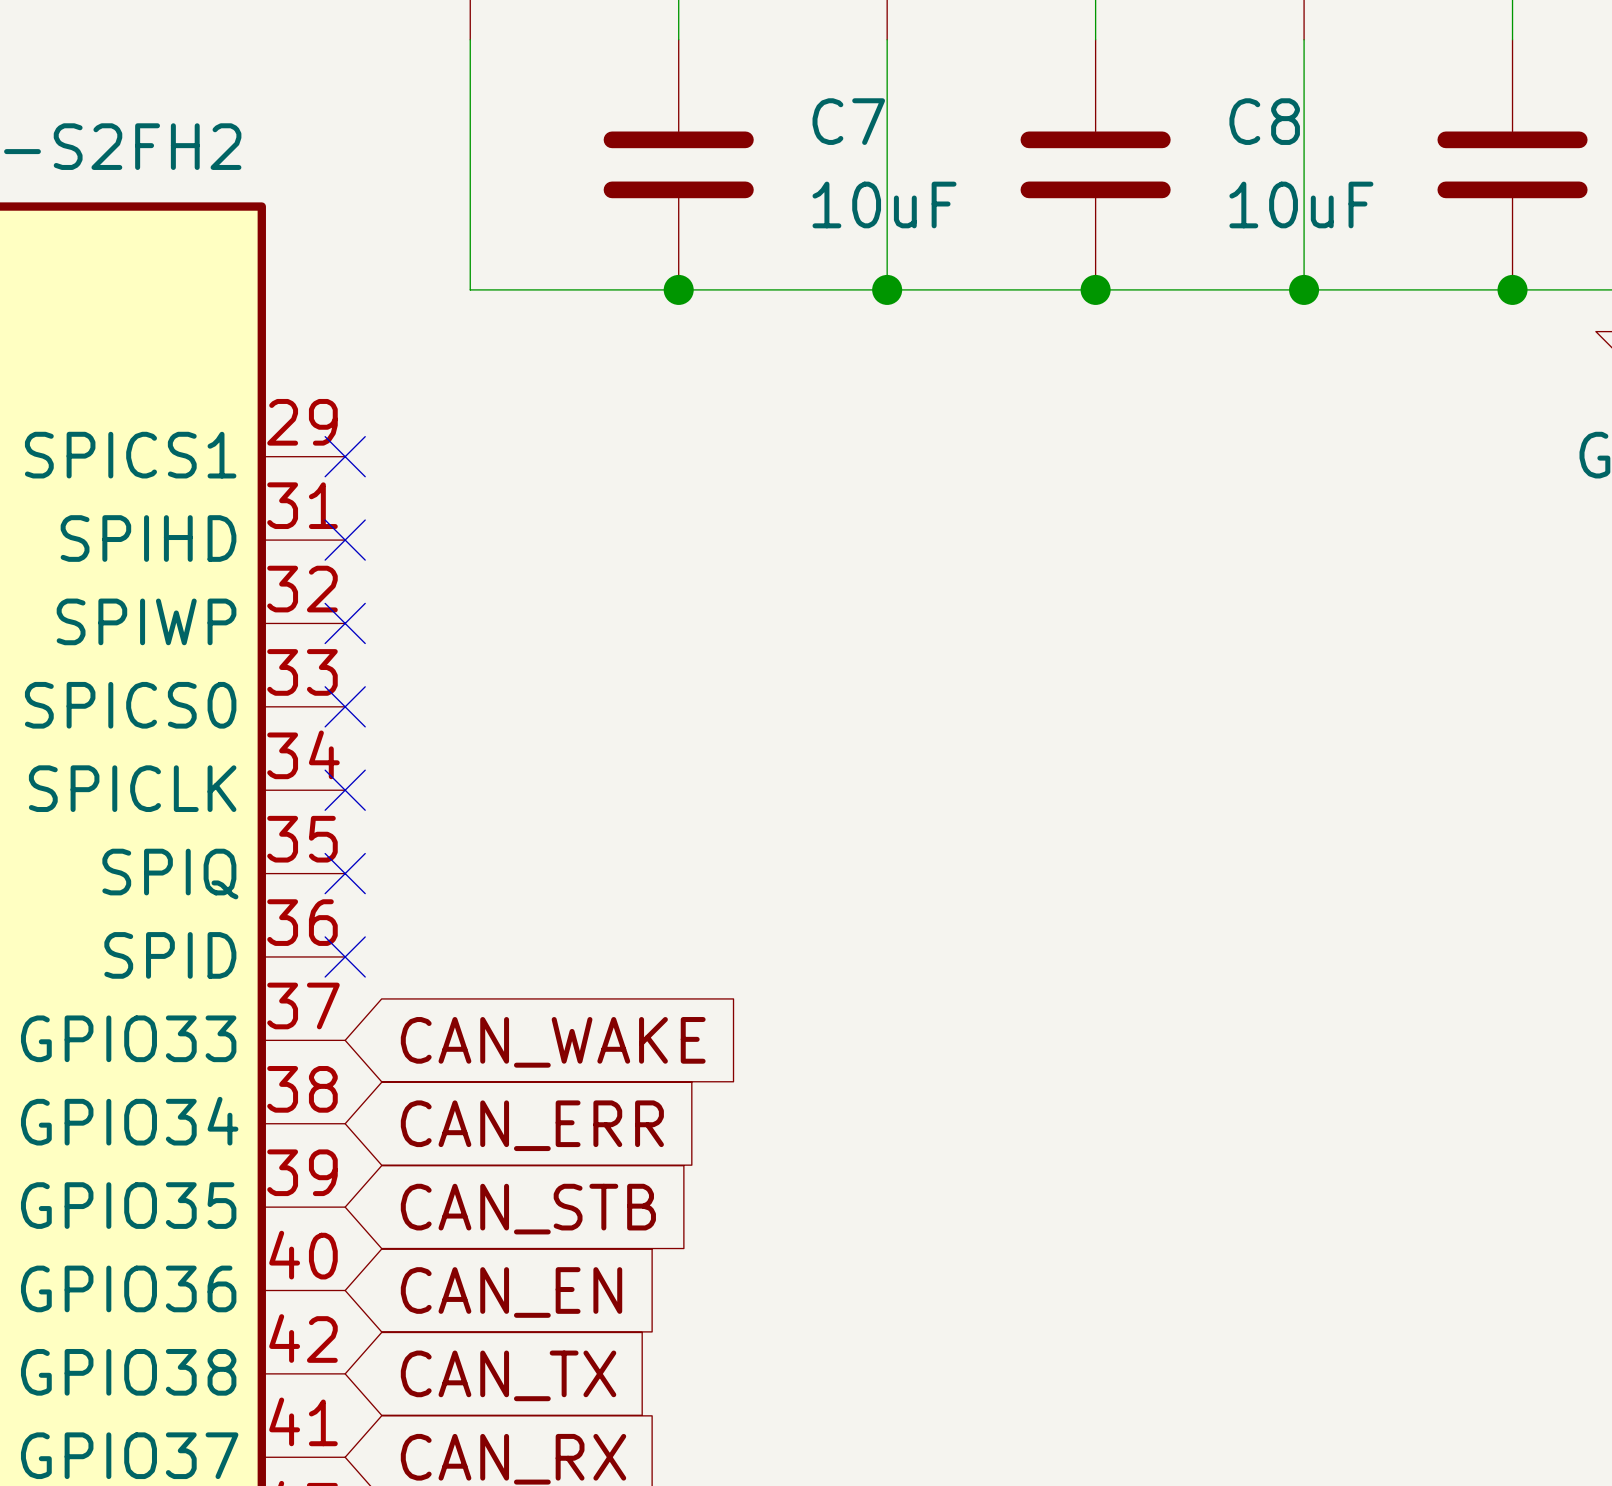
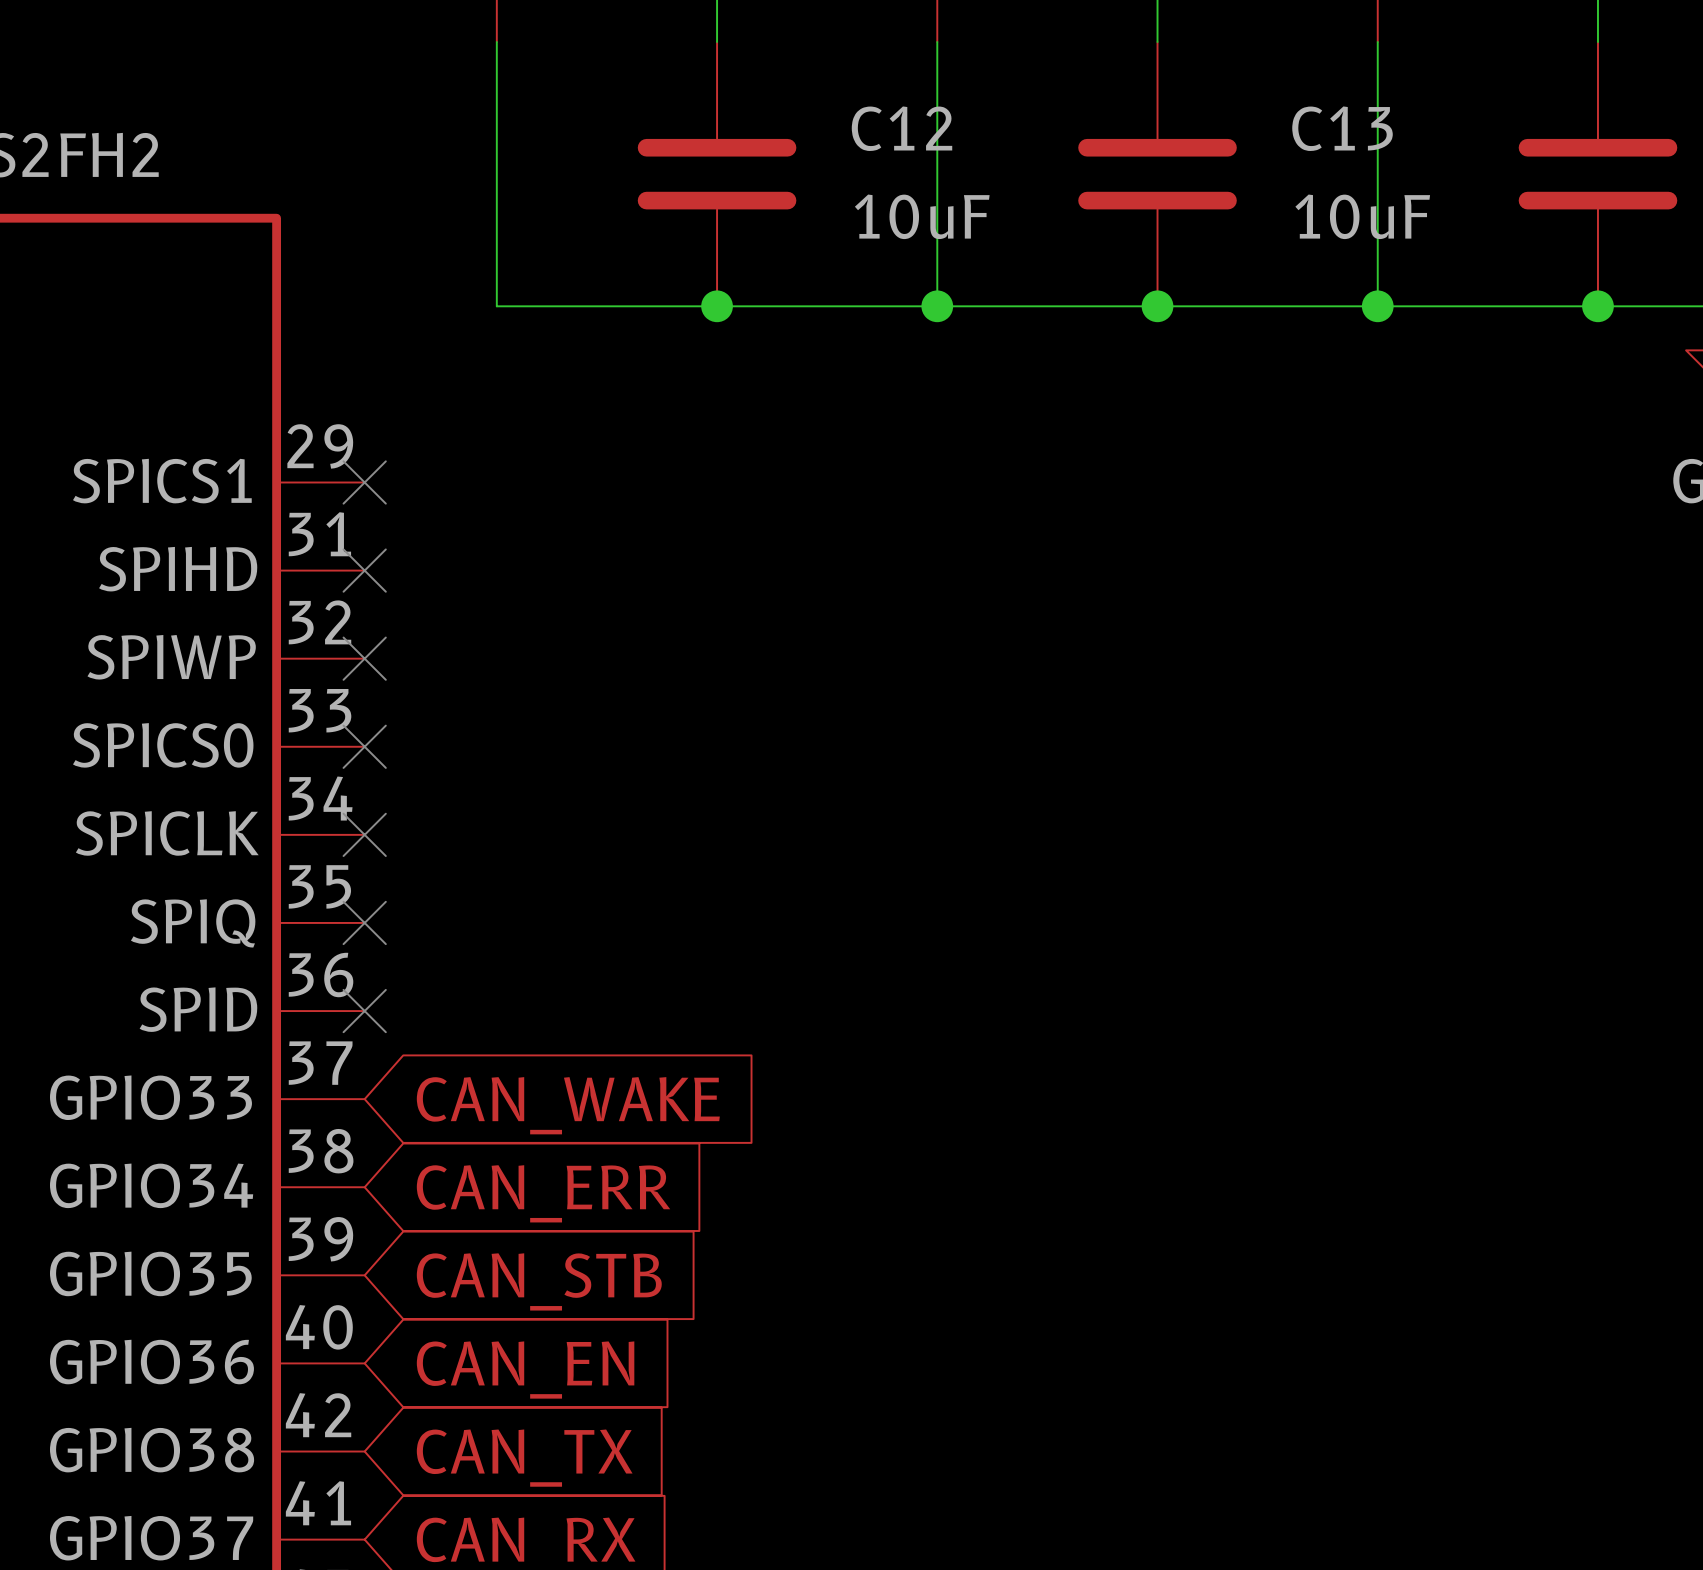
C7 name: C7 (848, 121) -> C12 (902, 128)
C8 name: C8 (1264, 121) -> C13 (1342, 128)

